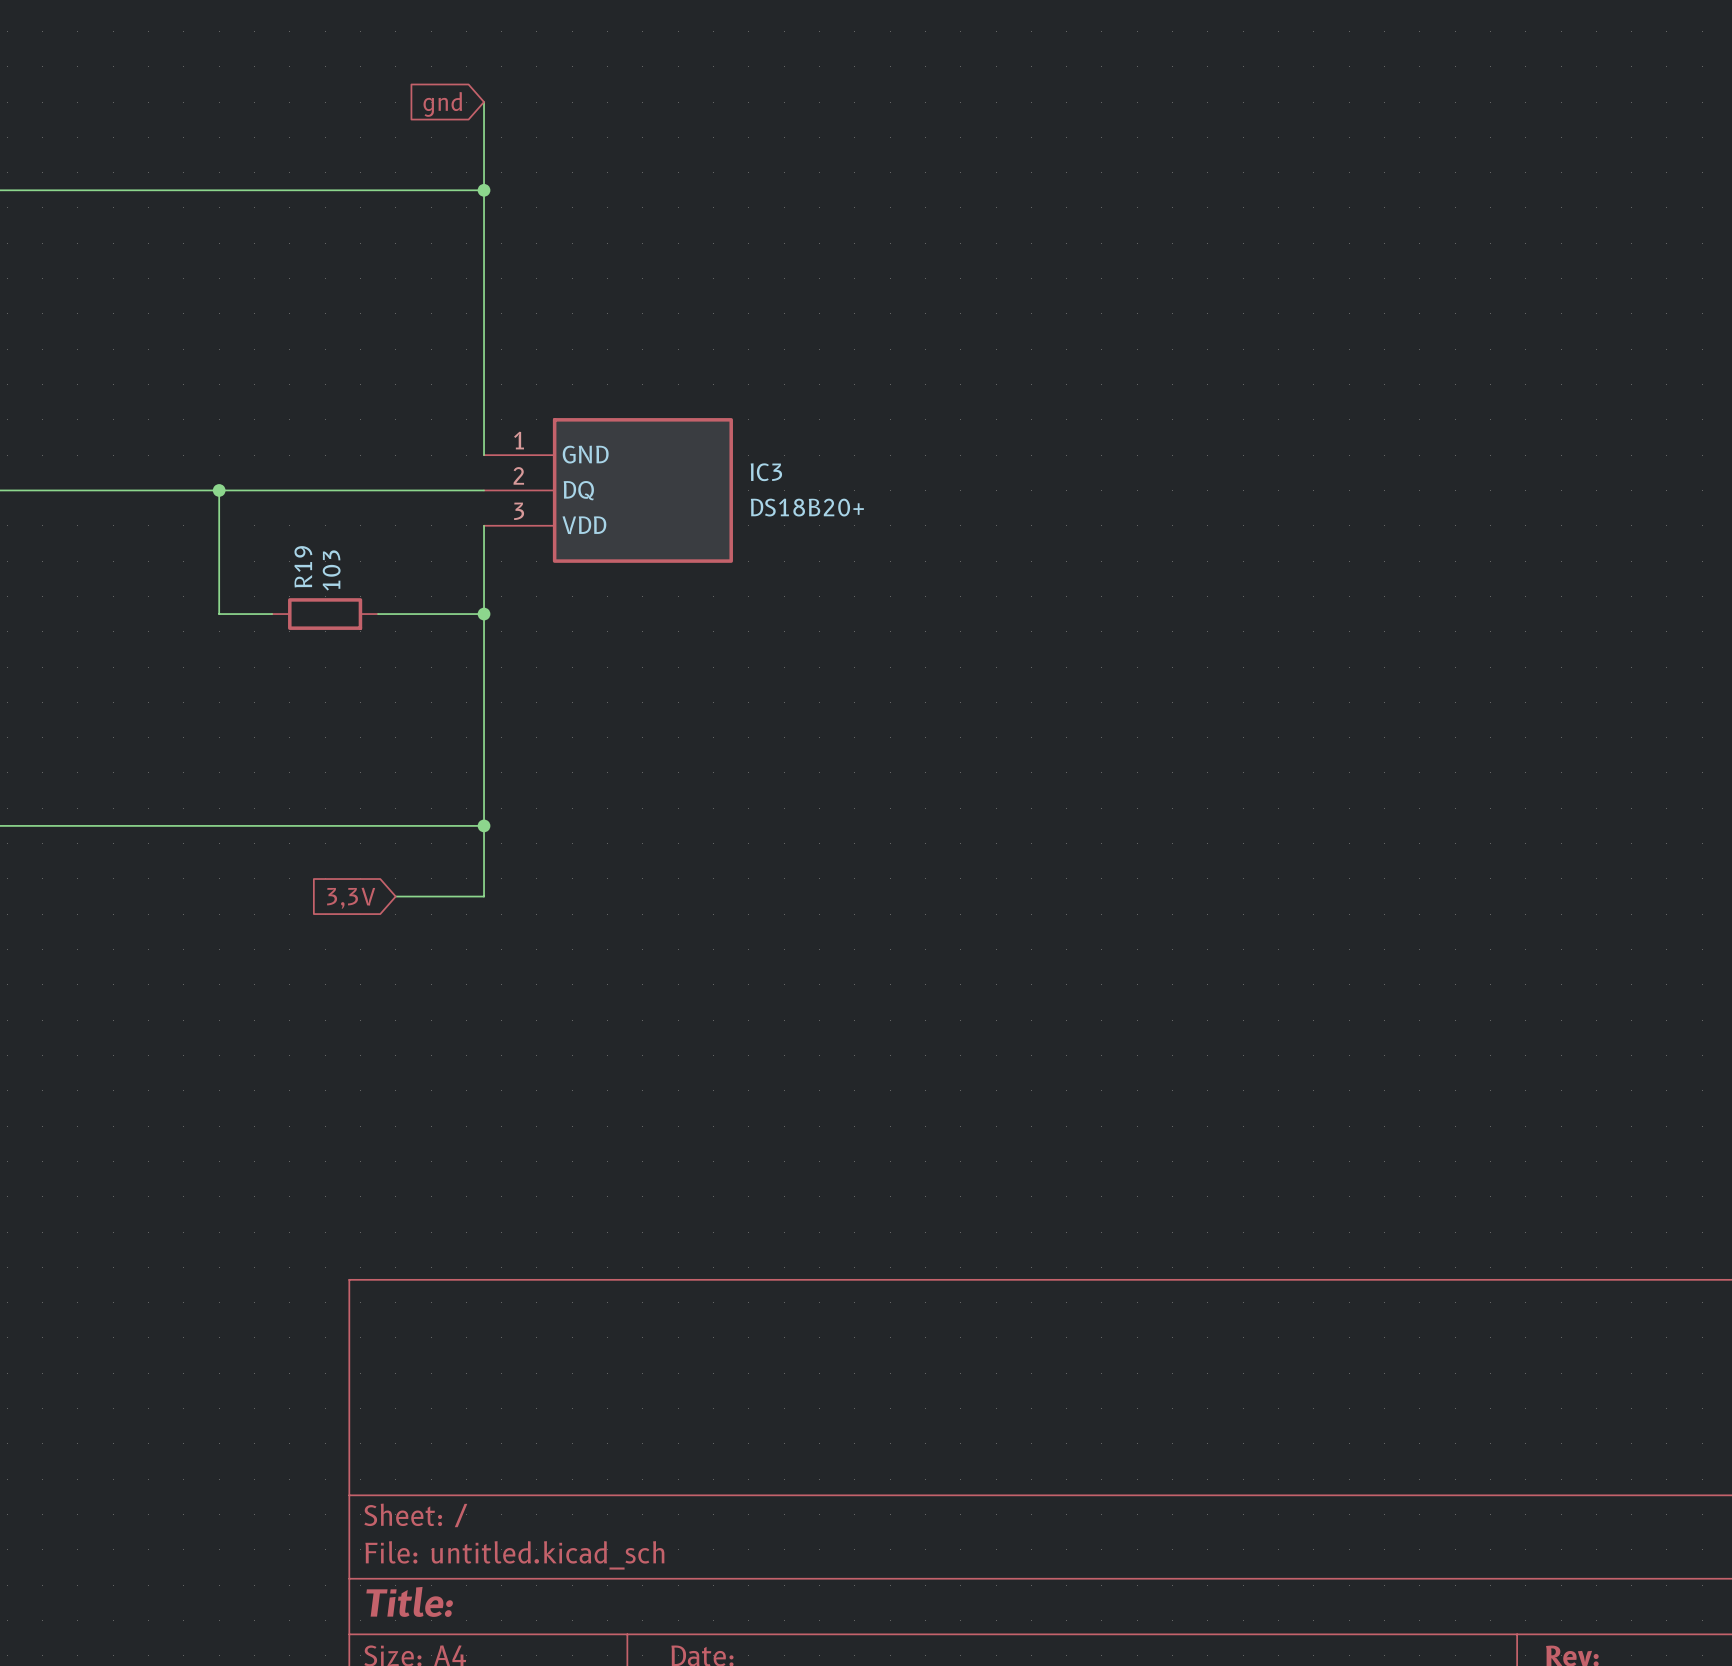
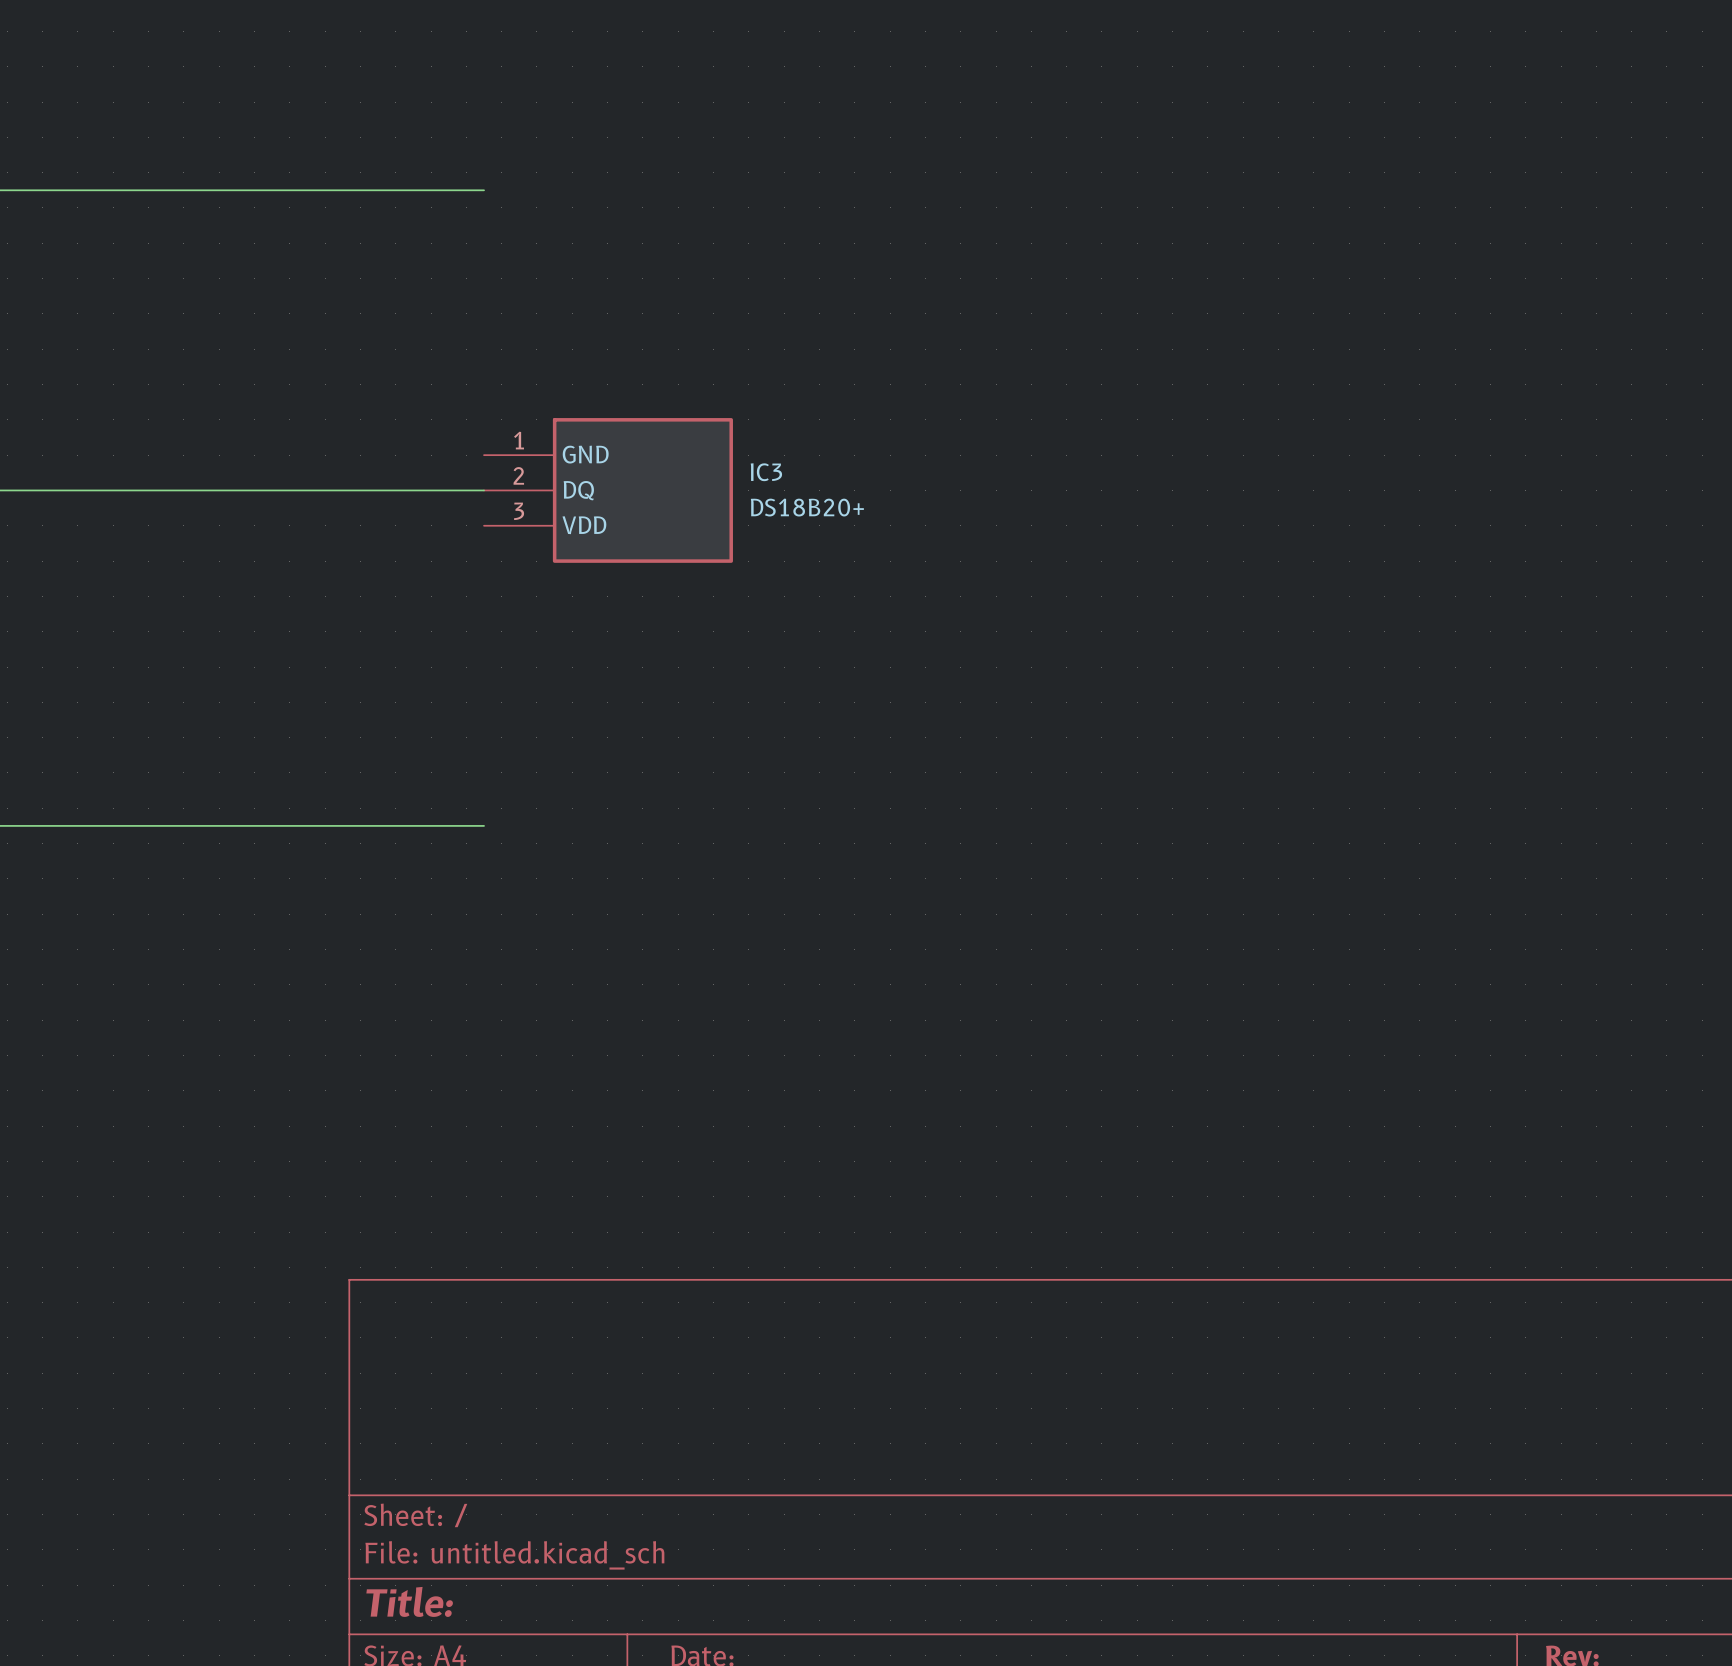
wire: (484, 102) (484, 455) -> none
global label: gnd (442, 104) -> none
junction: (484, 190) -> none
wire: (219, 490) (219, 614) (272, 614) -> none
junction: (219, 490) -> none
wire: (484, 525) (484, 896) (395, 896) -> none
R19: 103 (325, 614) -> none
wire: (378, 614) (484, 614) -> none
junction: (484, 614) -> none
junction: (484, 825) -> none
global label: 3,3V (351, 898) -> none

